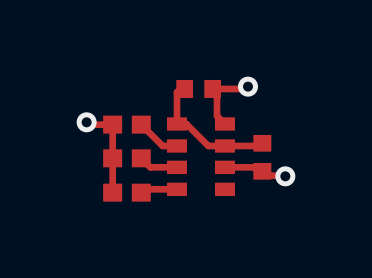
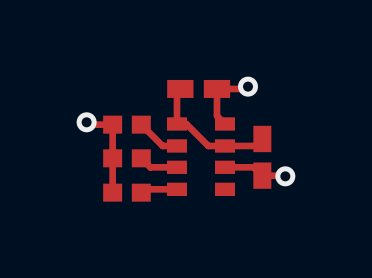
part footprint: [176, 79, 221, 98] -> [167, 79, 231, 98]
part footprint: [253, 134, 272, 180] -> [253, 125, 272, 189]

